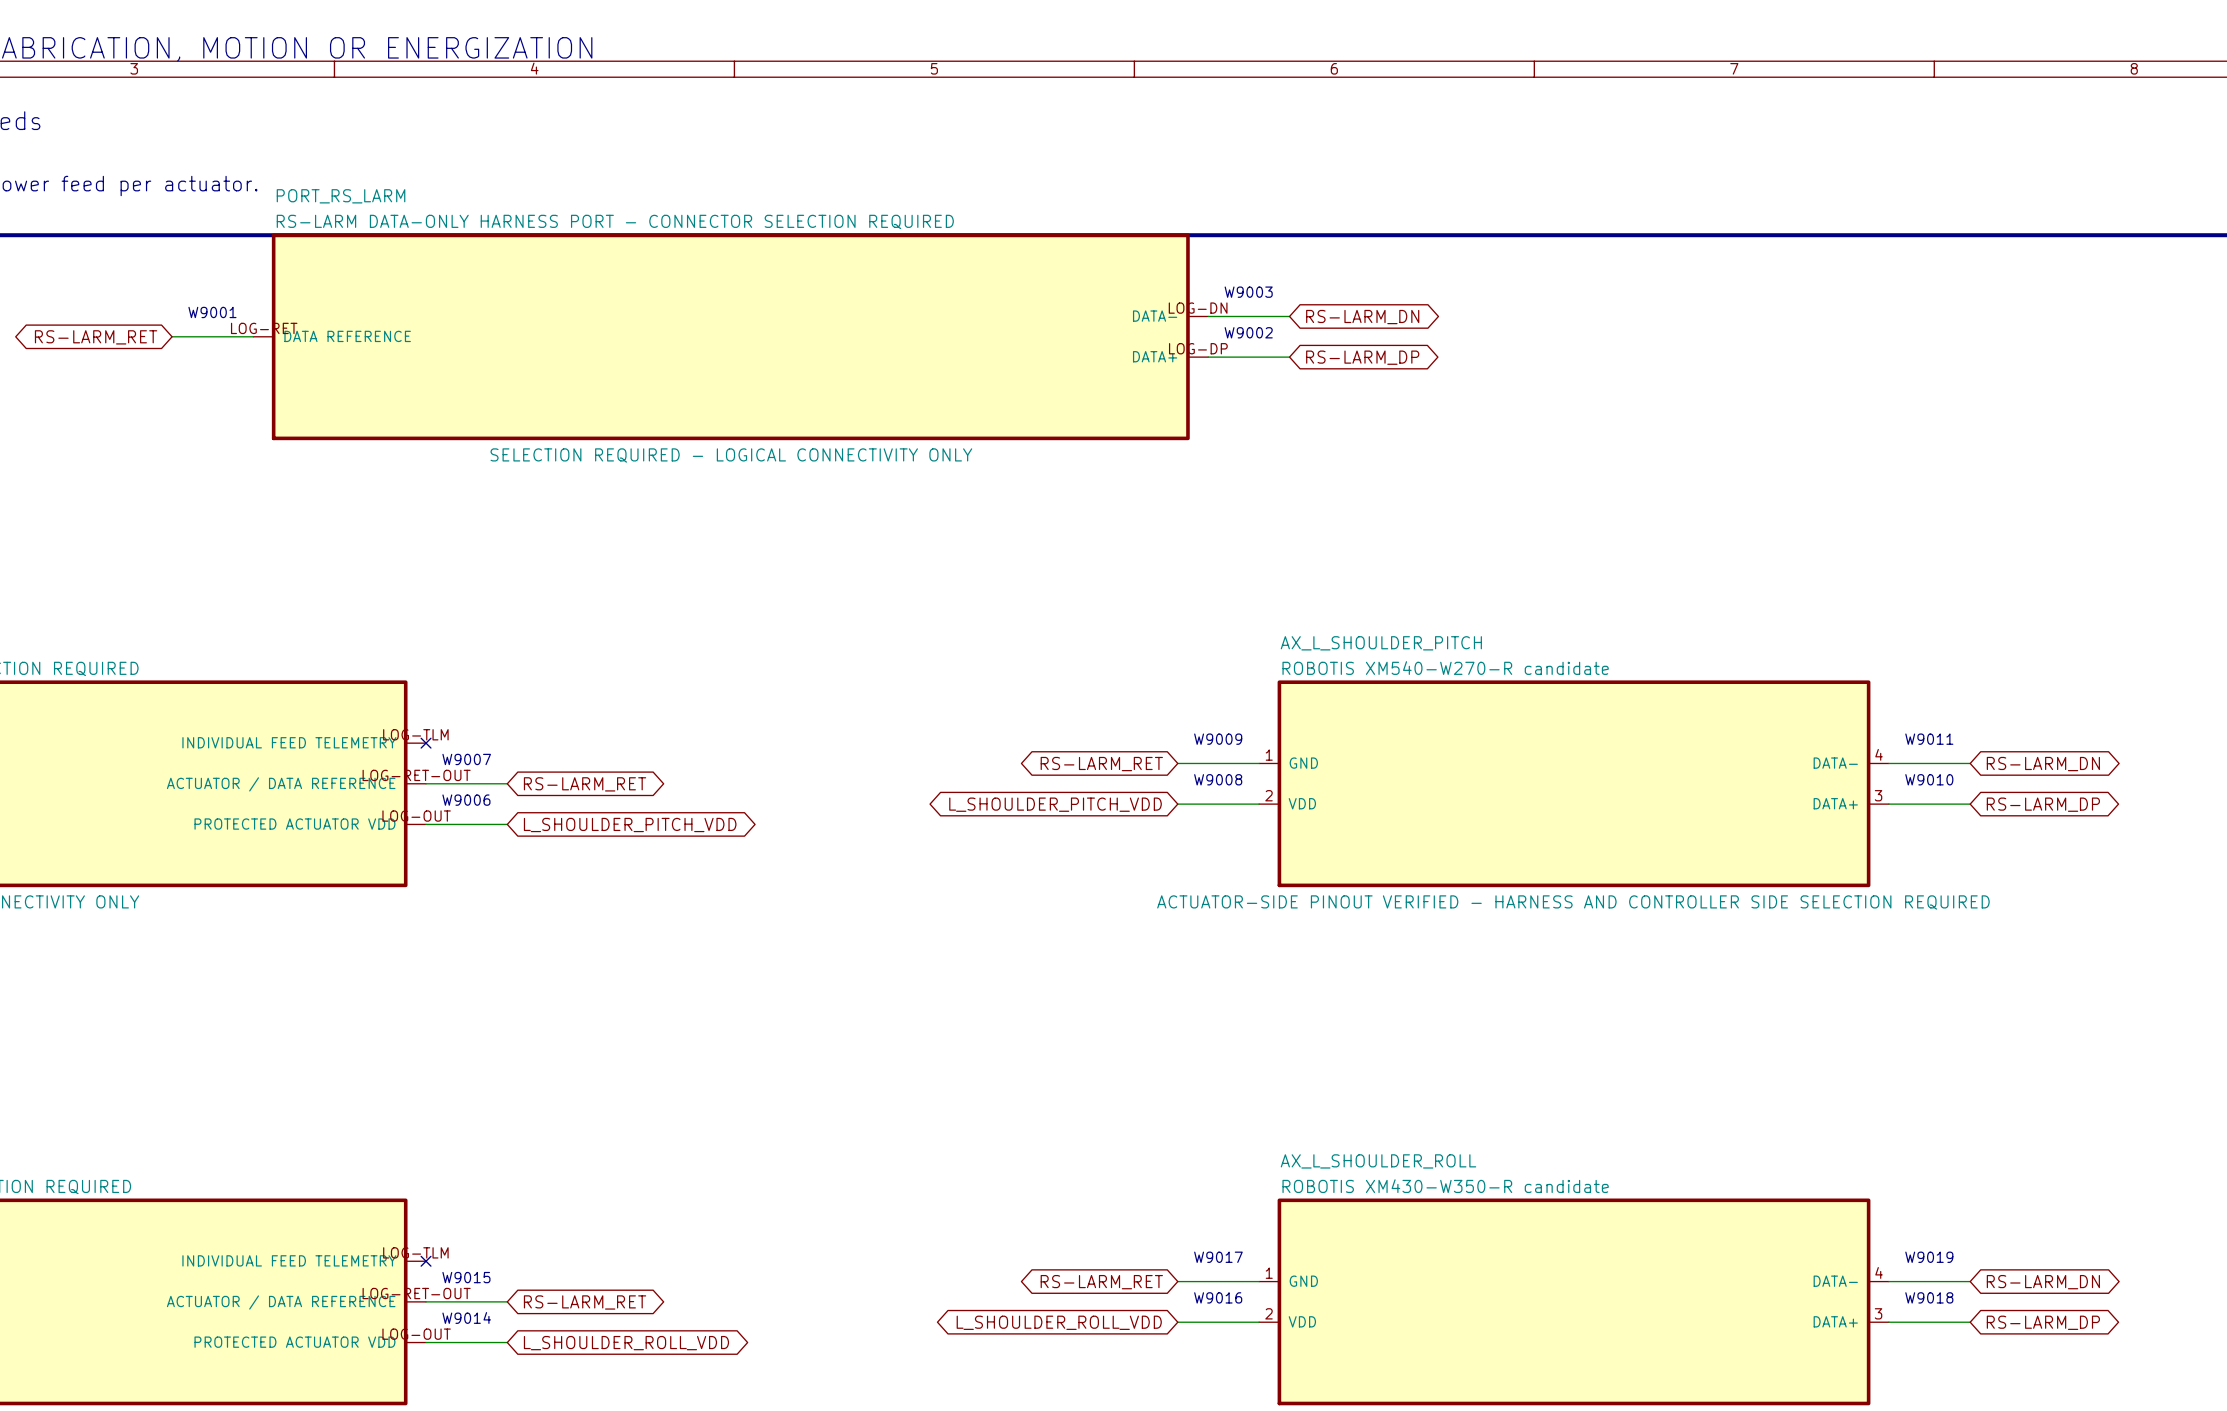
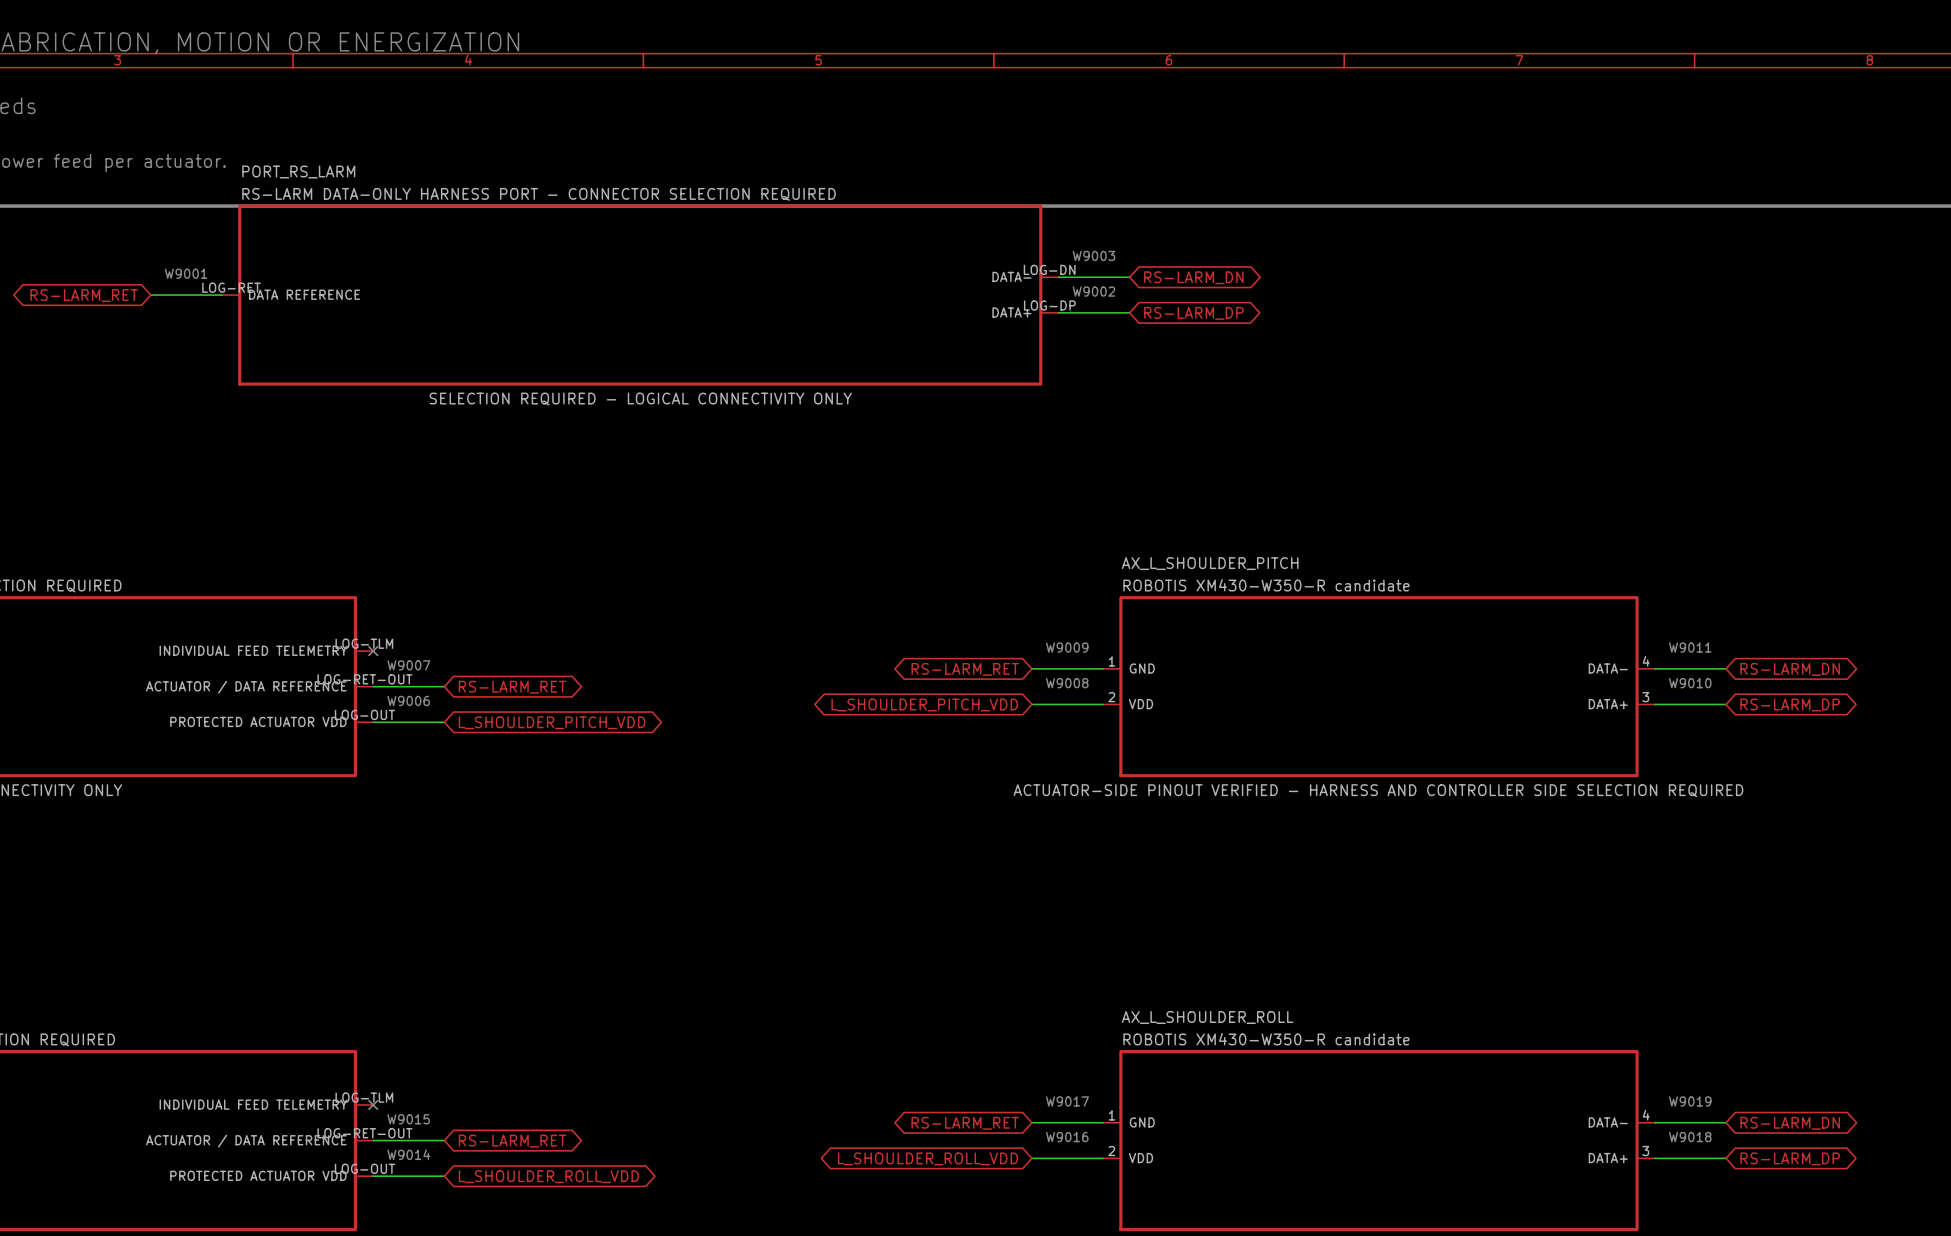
AX_L_SHOULDER_PITCH text: ROBOTIS XM540-W270-R candidate (1445, 668) -> ROBOTIS XM430-W350-R candidate (1266, 585)

